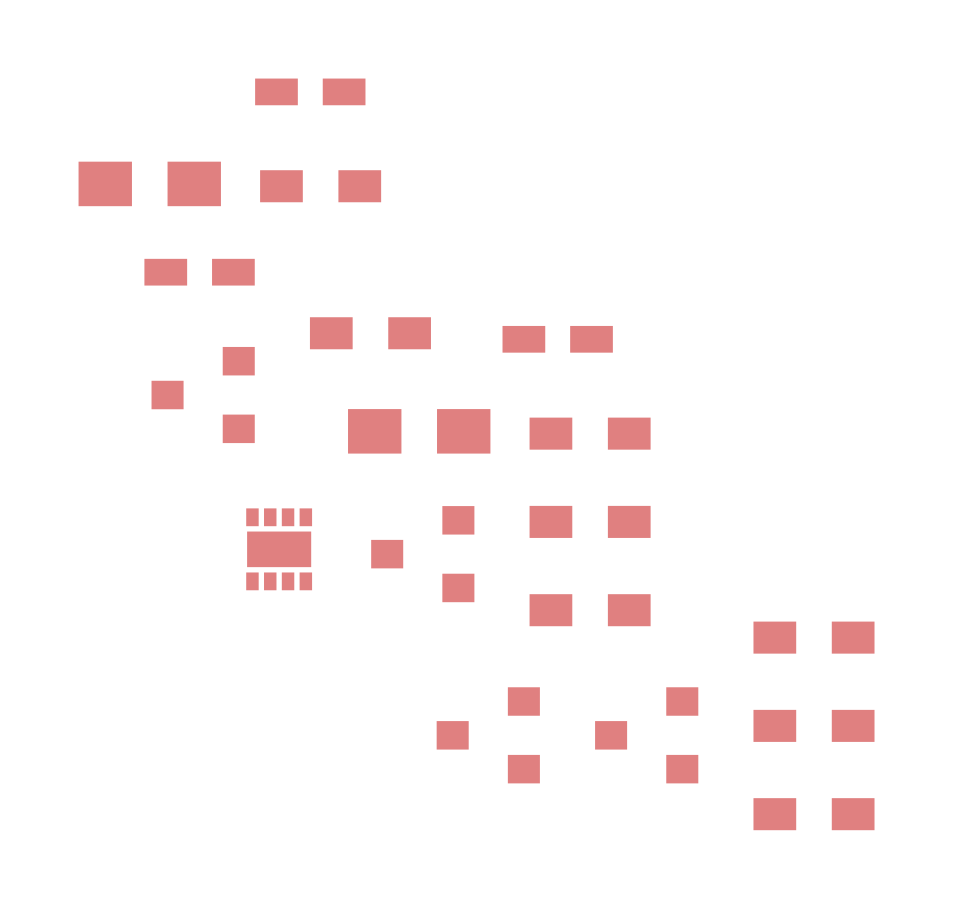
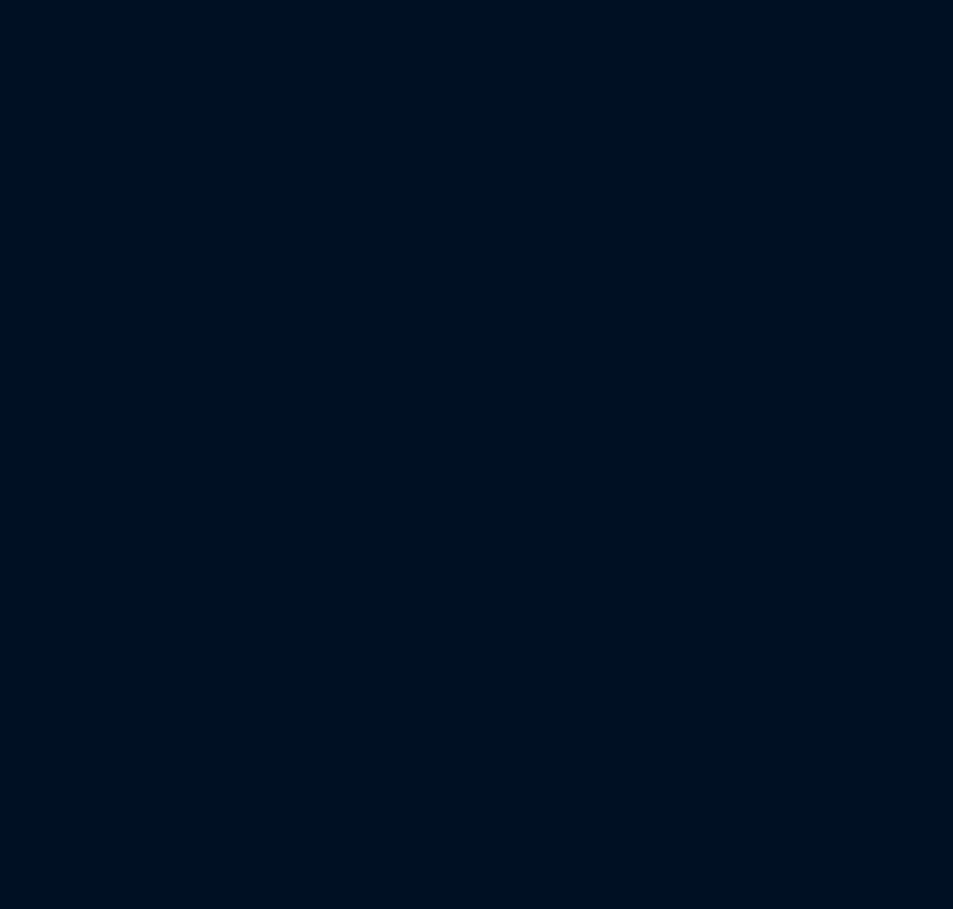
part: (310, 91) -> none
part: (149, 183) -> none
part: (320, 186) -> none
part: (199, 272) -> none
part: (370, 333) -> none
part: (557, 339) -> none
part: (203, 395) -> none
part: (419, 431) -> none
part: (590, 433) -> none
part: (590, 521) -> none
part: (279, 549) -> none
part: (422, 554) -> none
part: (590, 610) -> none
part: (813, 637) -> none
part: (813, 725) -> none
part: (488, 735) -> none
part: (646, 735) -> none
part: (813, 814) -> none

